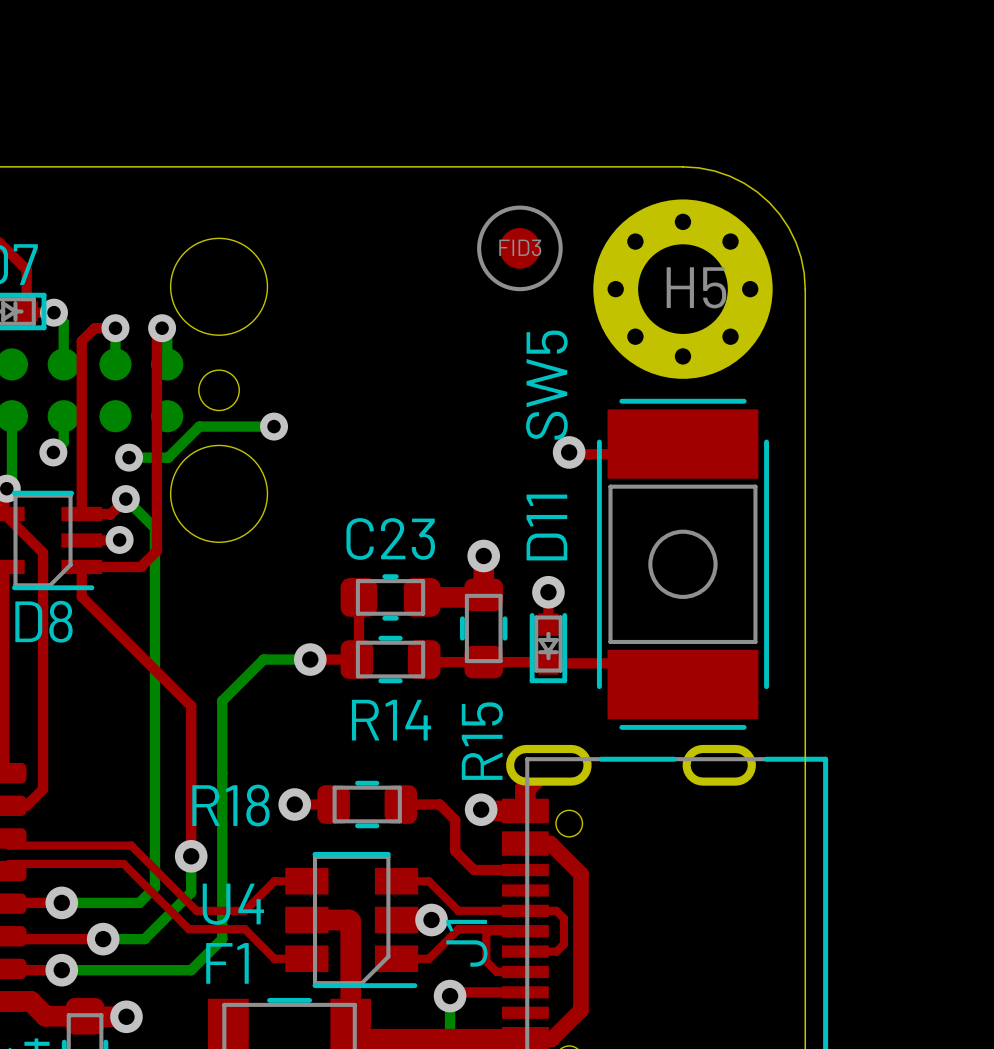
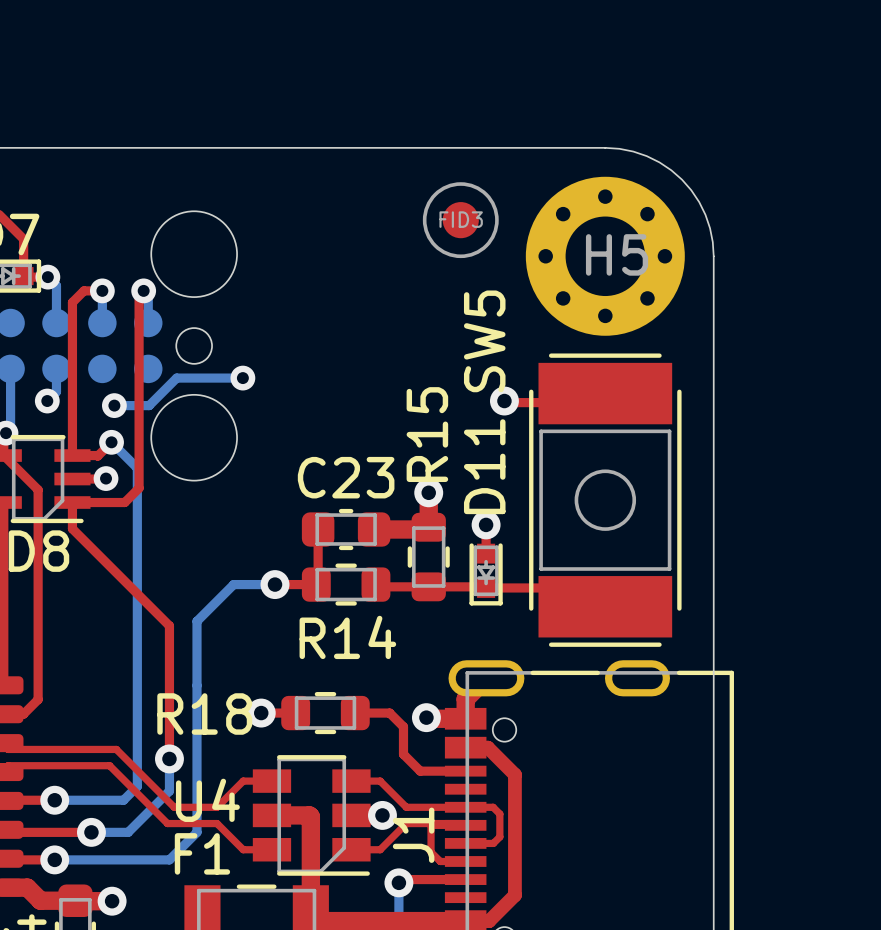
R15 name position: R15 (482, 741) -> R15 (427, 434)

